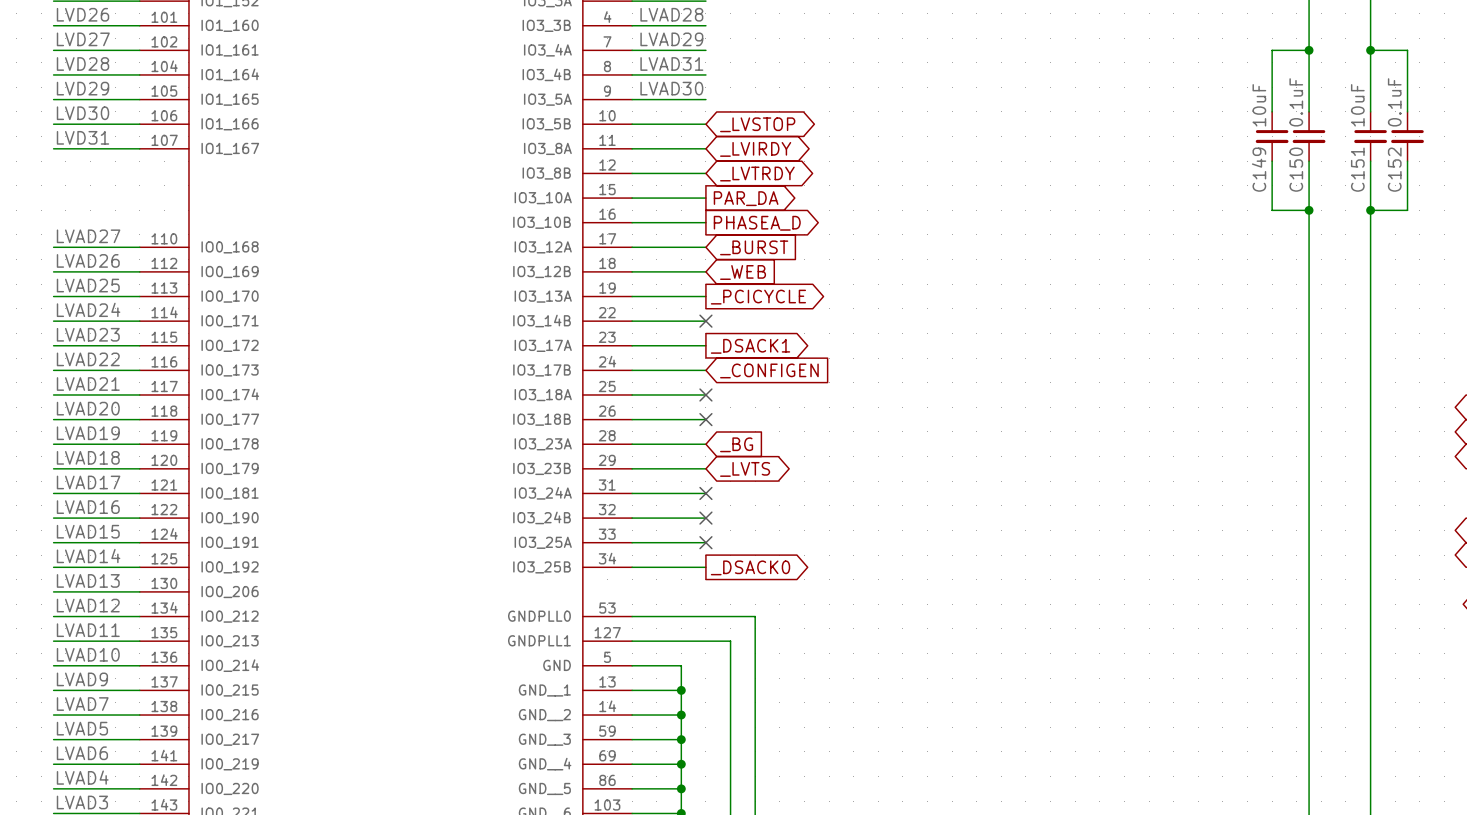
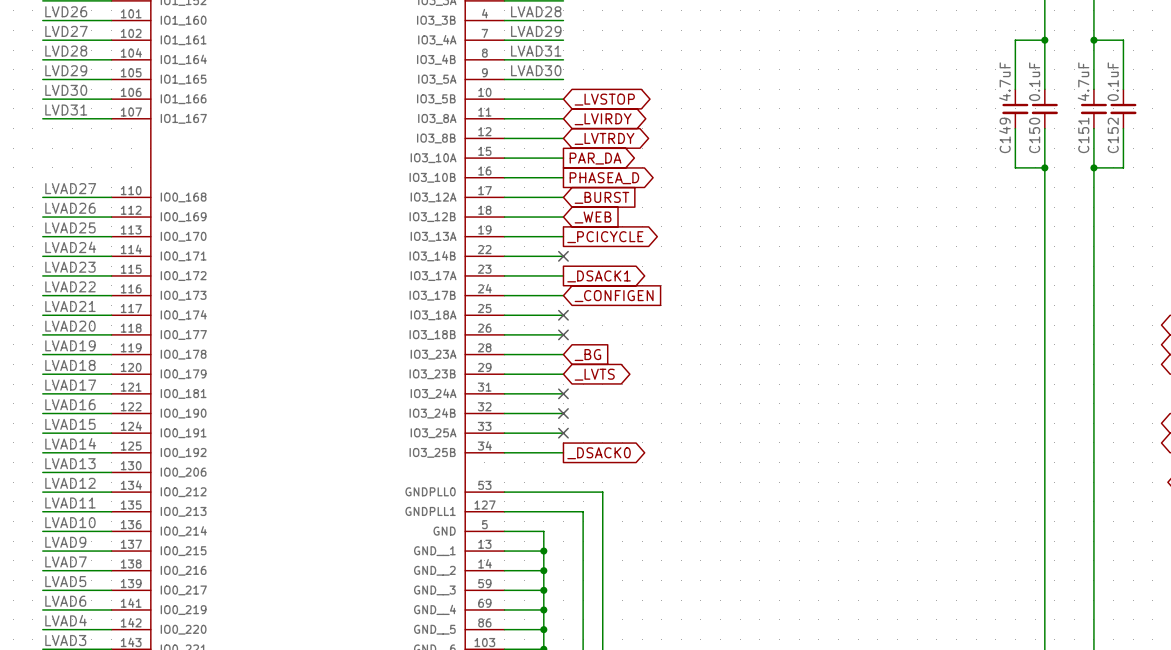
C149 value: 10uF (1259, 105) -> 4.7uF (1004, 81)
C151 value: 10uF (1357, 105) -> 4.7uF (1083, 81)

